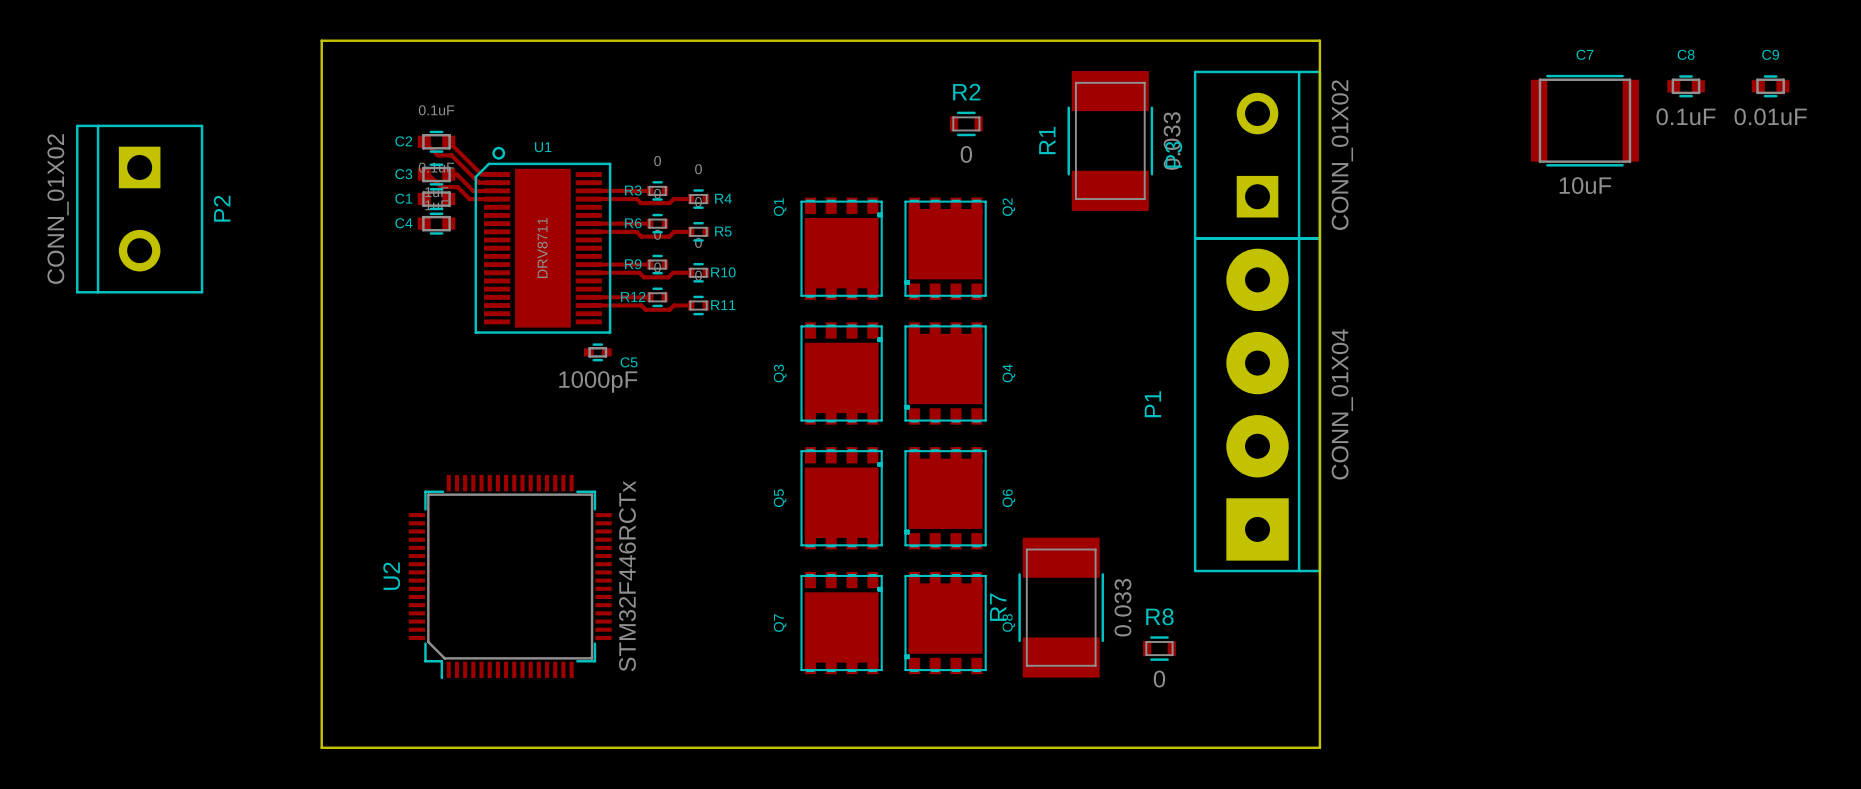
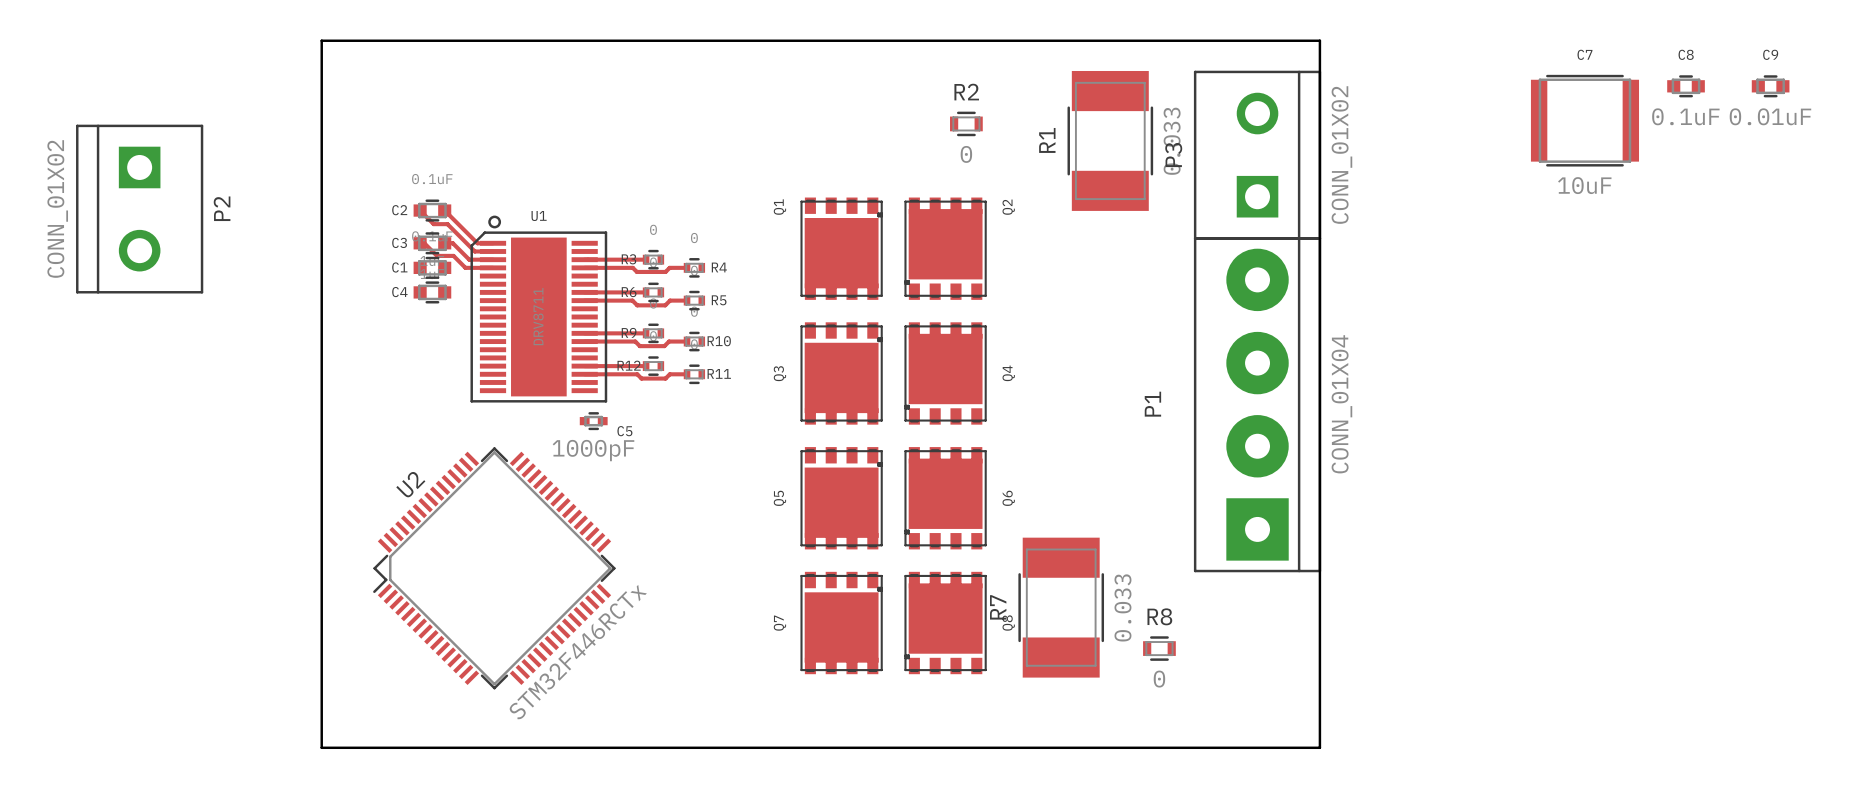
top track: (424, 141) (437, 155) (451, 155) (478, 182) (497, 182) -> (420, 210) (433, 224) (447, 224) (474, 251) (493, 251)
C3 position: (436, 141) -> (432, 210)
top track: (448, 141) (481, 174) (497, 174) -> (444, 210) (477, 243) (493, 243)
top track: (424, 174) (428, 174) (441, 187) (457, 187) (469, 199) (497, 199) -> (420, 243) (424, 243) (437, 255) (453, 255) (465, 267) (493, 267)
C2 position: (436, 174) -> (432, 243)
top track: (448, 174) (456, 174) (473, 190) (497, 190) -> (444, 243) (452, 243) (469, 259) (493, 259)
top track: (588, 190) (650, 190) -> (584, 259) (646, 259)
R3 position: (657, 190) -> (653, 259)
C1 position: (436, 199) -> (432, 267)
top track: (588, 199) (636, 199) (641, 203) (669, 203) (673, 199) (691, 199) -> (584, 267) (632, 267) (636, 271) (665, 271) (669, 267) (687, 267)
R4 position: (698, 199) -> (694, 267)
C4 position: (436, 223) -> (432, 292)
top track: (588, 223) (650, 223) -> (584, 292) (646, 292)
R6 position: (657, 223) -> (653, 292)
top track: (588, 231) (636, 231) (641, 236) (669, 236) (674, 231) (691, 231) -> (584, 300) (632, 300) (637, 305) (665, 305) (670, 300) (687, 300)
R5 position: (698, 231) -> (694, 300)
U1 position: (542, 240) -> (538, 309)
top track: (588, 264) (650, 264) -> (584, 333) (646, 333)
R9 position: (657, 264) -> (653, 333)
top track: (588, 272) (639, 272) (643, 277) (668, 277) (673, 272) (691, 272) -> (584, 341) (635, 341) (639, 346) (664, 346) (669, 341) (687, 341)
R10 position: (698, 272) -> (694, 341)
top track: (588, 297) (650, 297) -> (584, 366) (646, 366)
R12 position: (657, 297) -> (653, 366)
top track: (588, 305) (641, 305) (645, 309) (669, 309) (673, 305) (691, 305) -> (584, 374) (637, 374) (641, 378) (665, 378) (669, 374) (687, 374)
R11 position: (698, 305) -> (694, 374)
C5 position: (597, 352) -> (593, 421)
U2 rotation: 0° (510, 577) -> 45° clockwise (494, 568)

